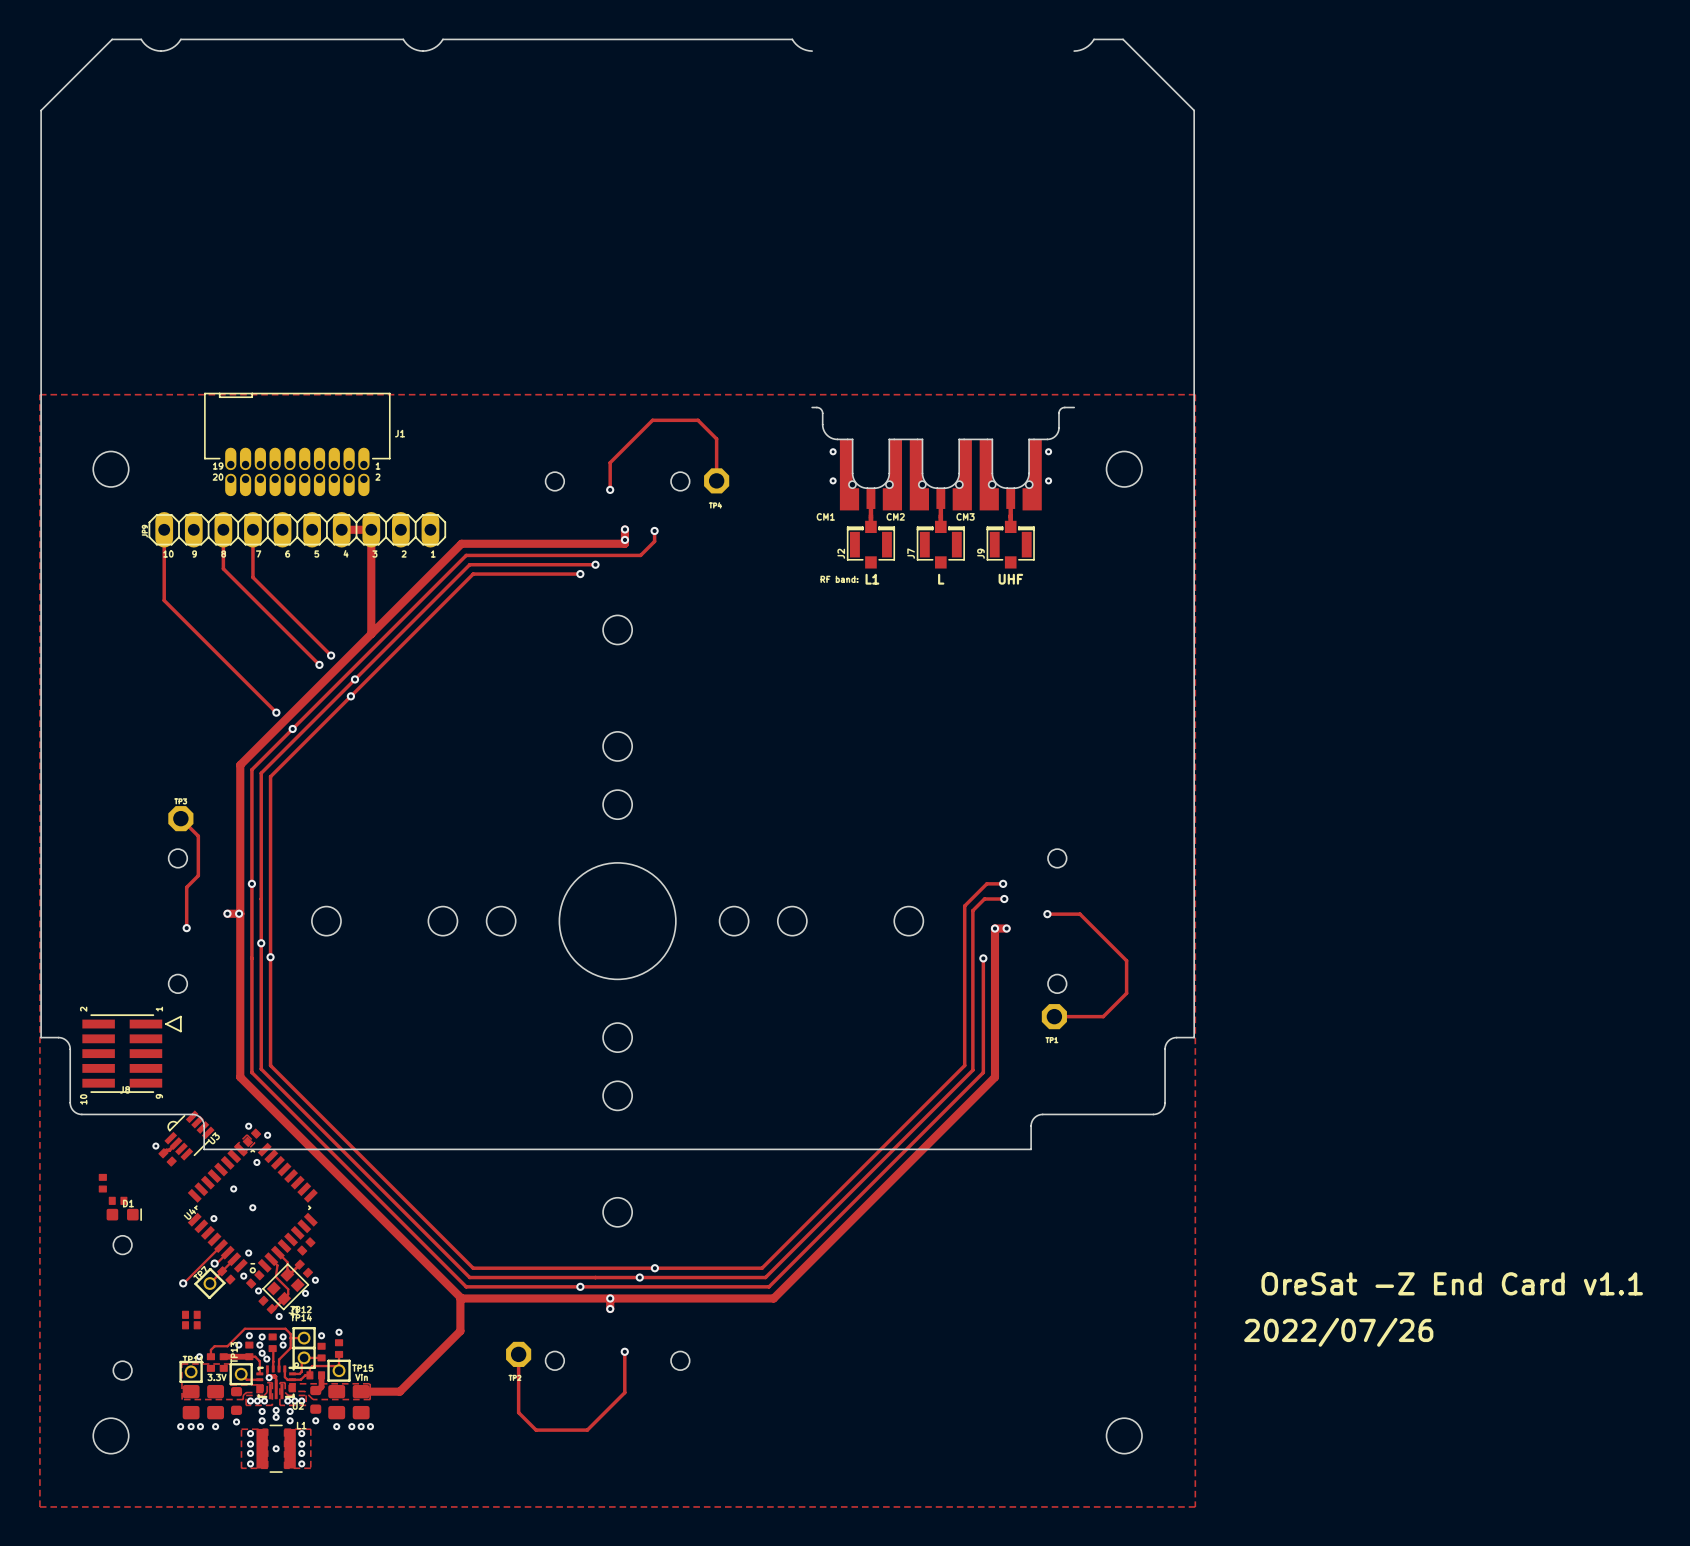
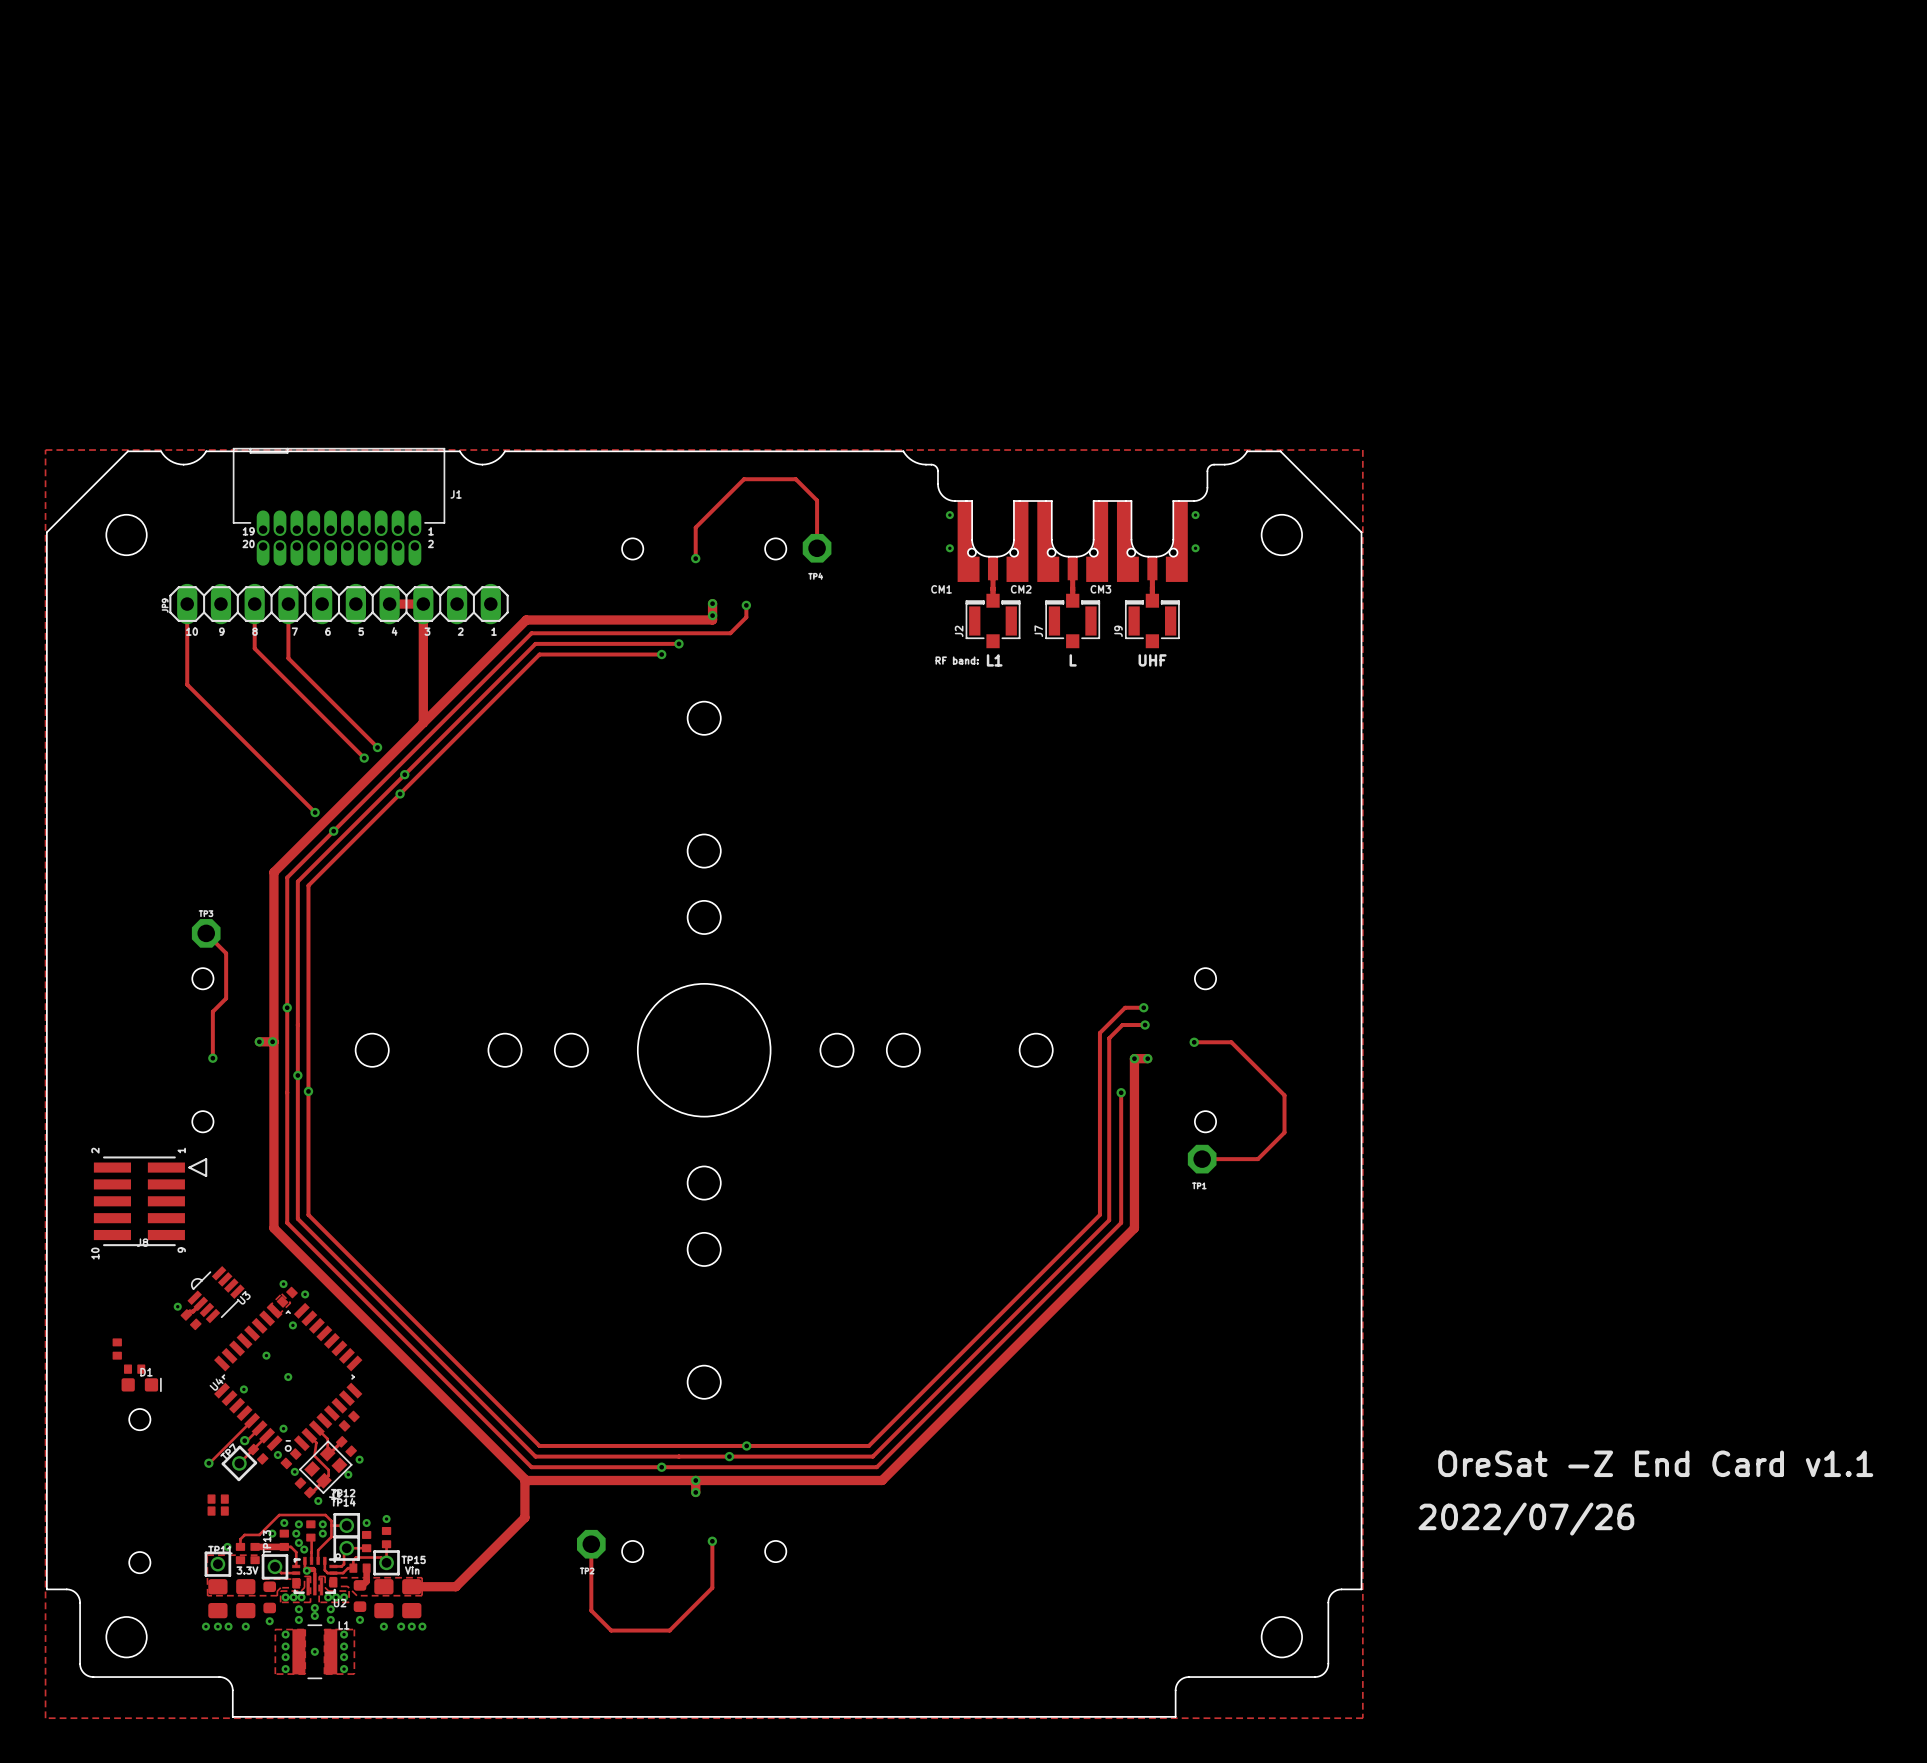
drawing: [40, 39, 1195, 1150] -> none
drawing: none -> [46, 451, 1362, 1718]

